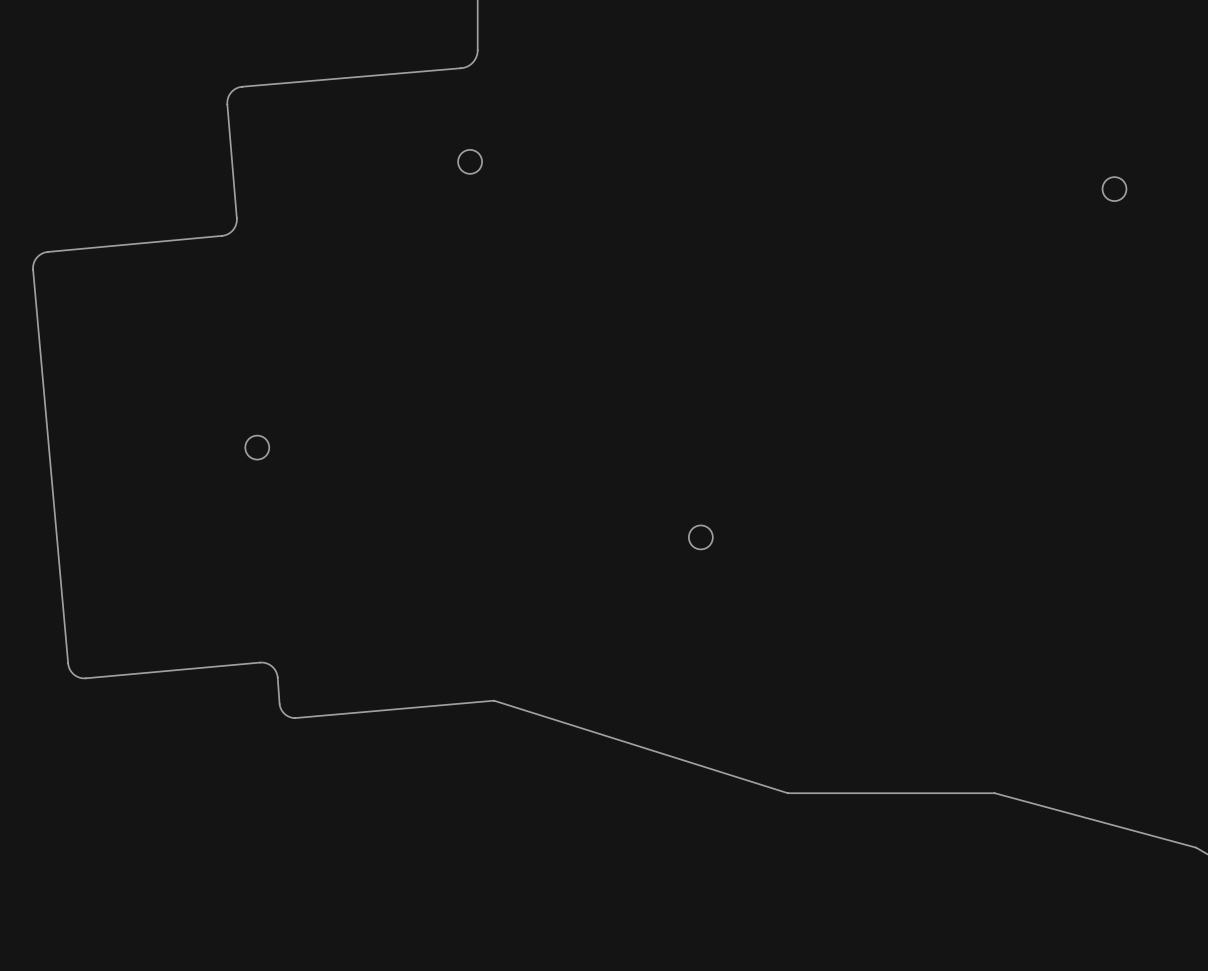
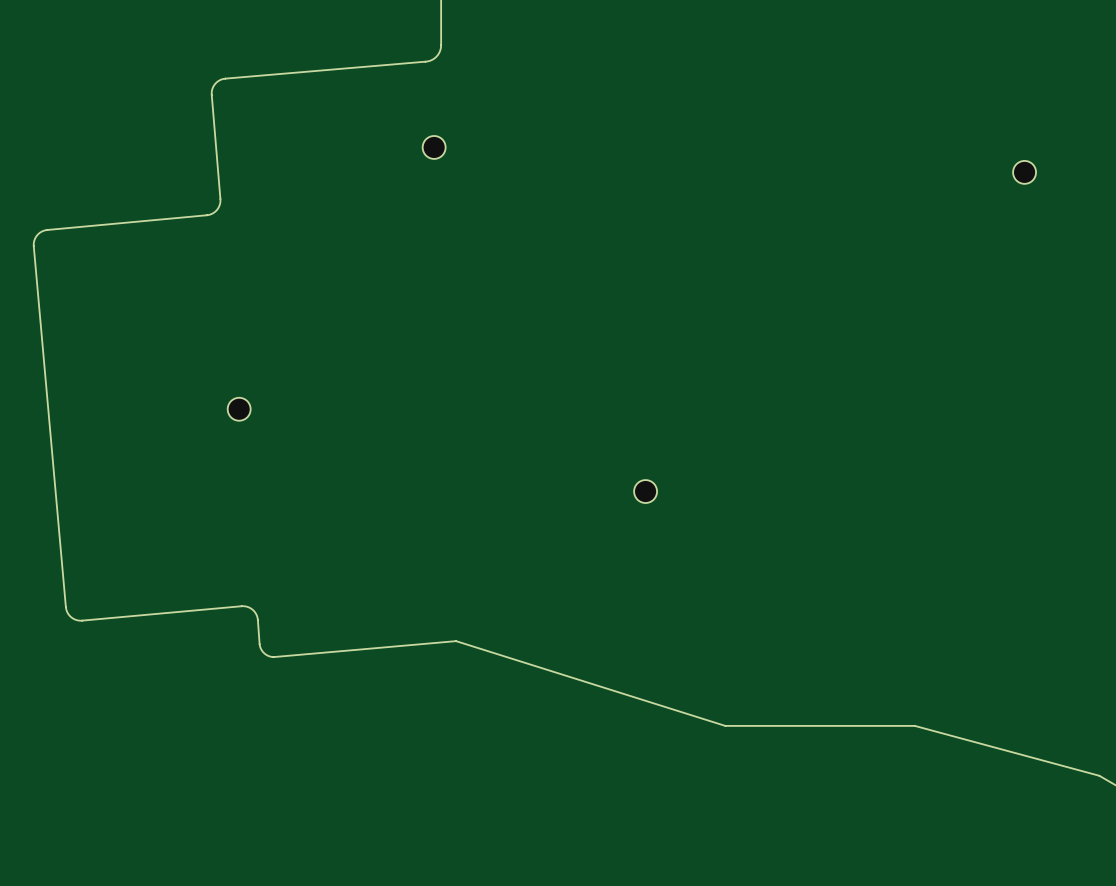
drawing: [457, 149, 483, 175] -> none
part: none -> (434, 147)
drawing: [1101, 176, 1128, 202] -> none
part: none -> (1024, 172)
drawing: [244, 434, 270, 461] -> none
part: none -> (239, 409)
drawing: [688, 524, 714, 551] -> none
part: none -> (645, 491)

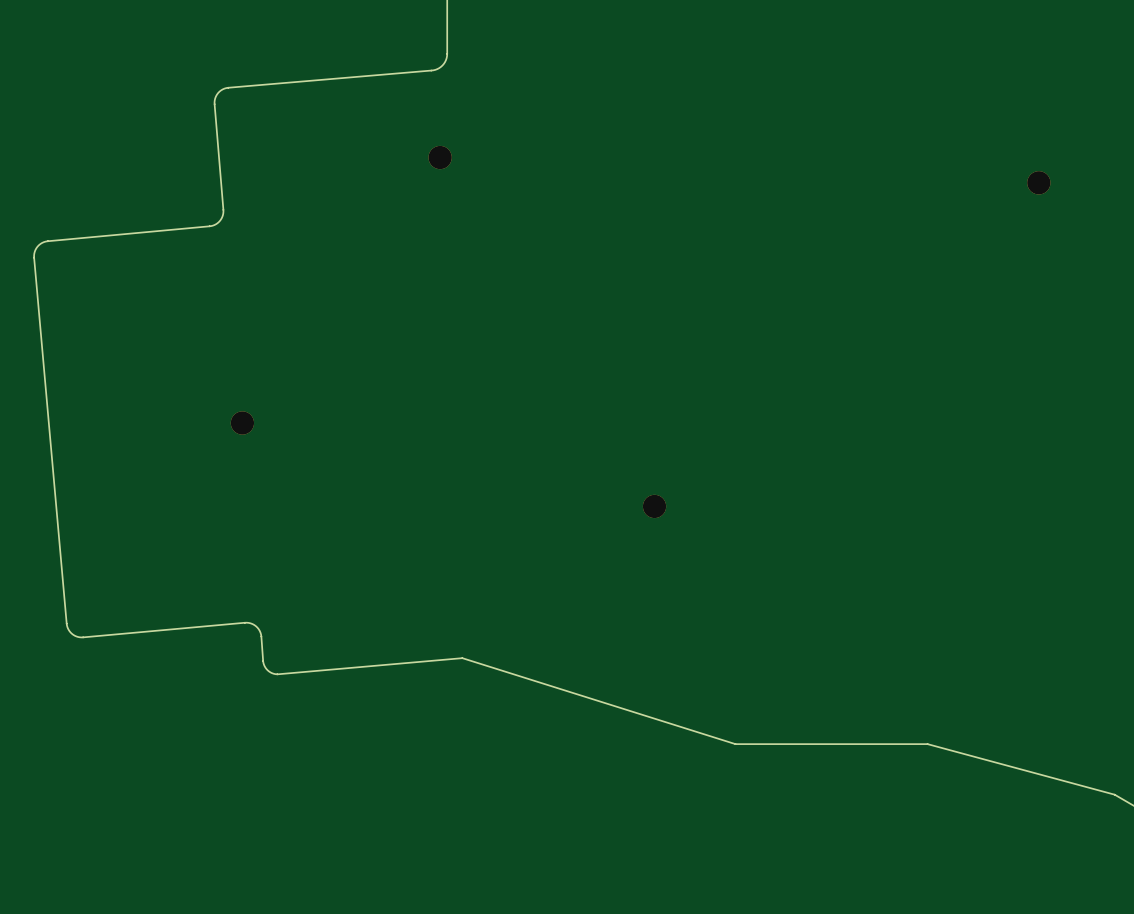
part footprint: [422, 135, 446, 159] -> [428, 145, 452, 170]
part footprint: [1013, 160, 1037, 184] -> [1027, 171, 1051, 195]
part footprint: [227, 397, 251, 421] -> [230, 411, 255, 435]
part footprint: [634, 480, 658, 504] -> [642, 494, 667, 519]

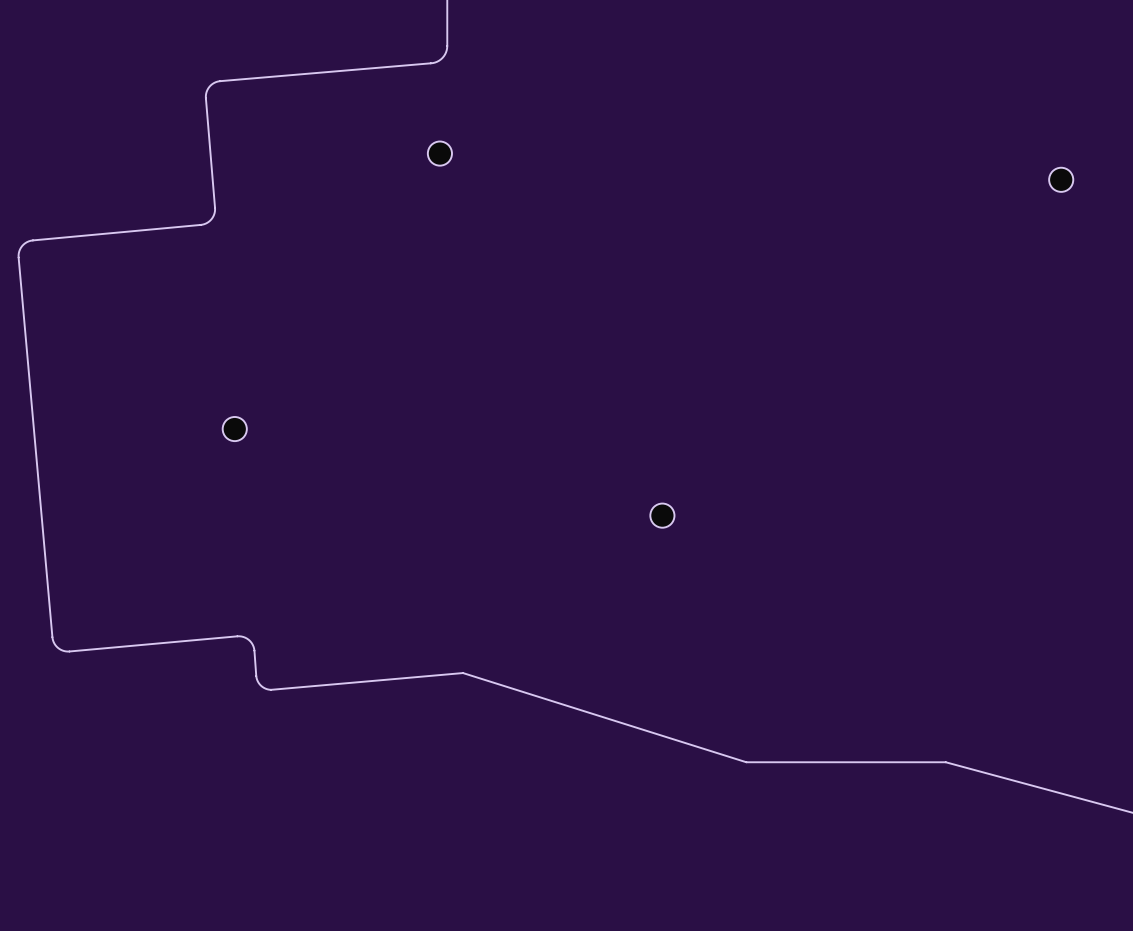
part footprint: [428, 145, 452, 170] -> [427, 141, 452, 166]
part footprint: [1027, 171, 1051, 195] -> [1049, 167, 1074, 192]
part footprint: [230, 411, 255, 435] -> [222, 416, 247, 442]
part footprint: [642, 494, 667, 519] -> [650, 503, 675, 528]

